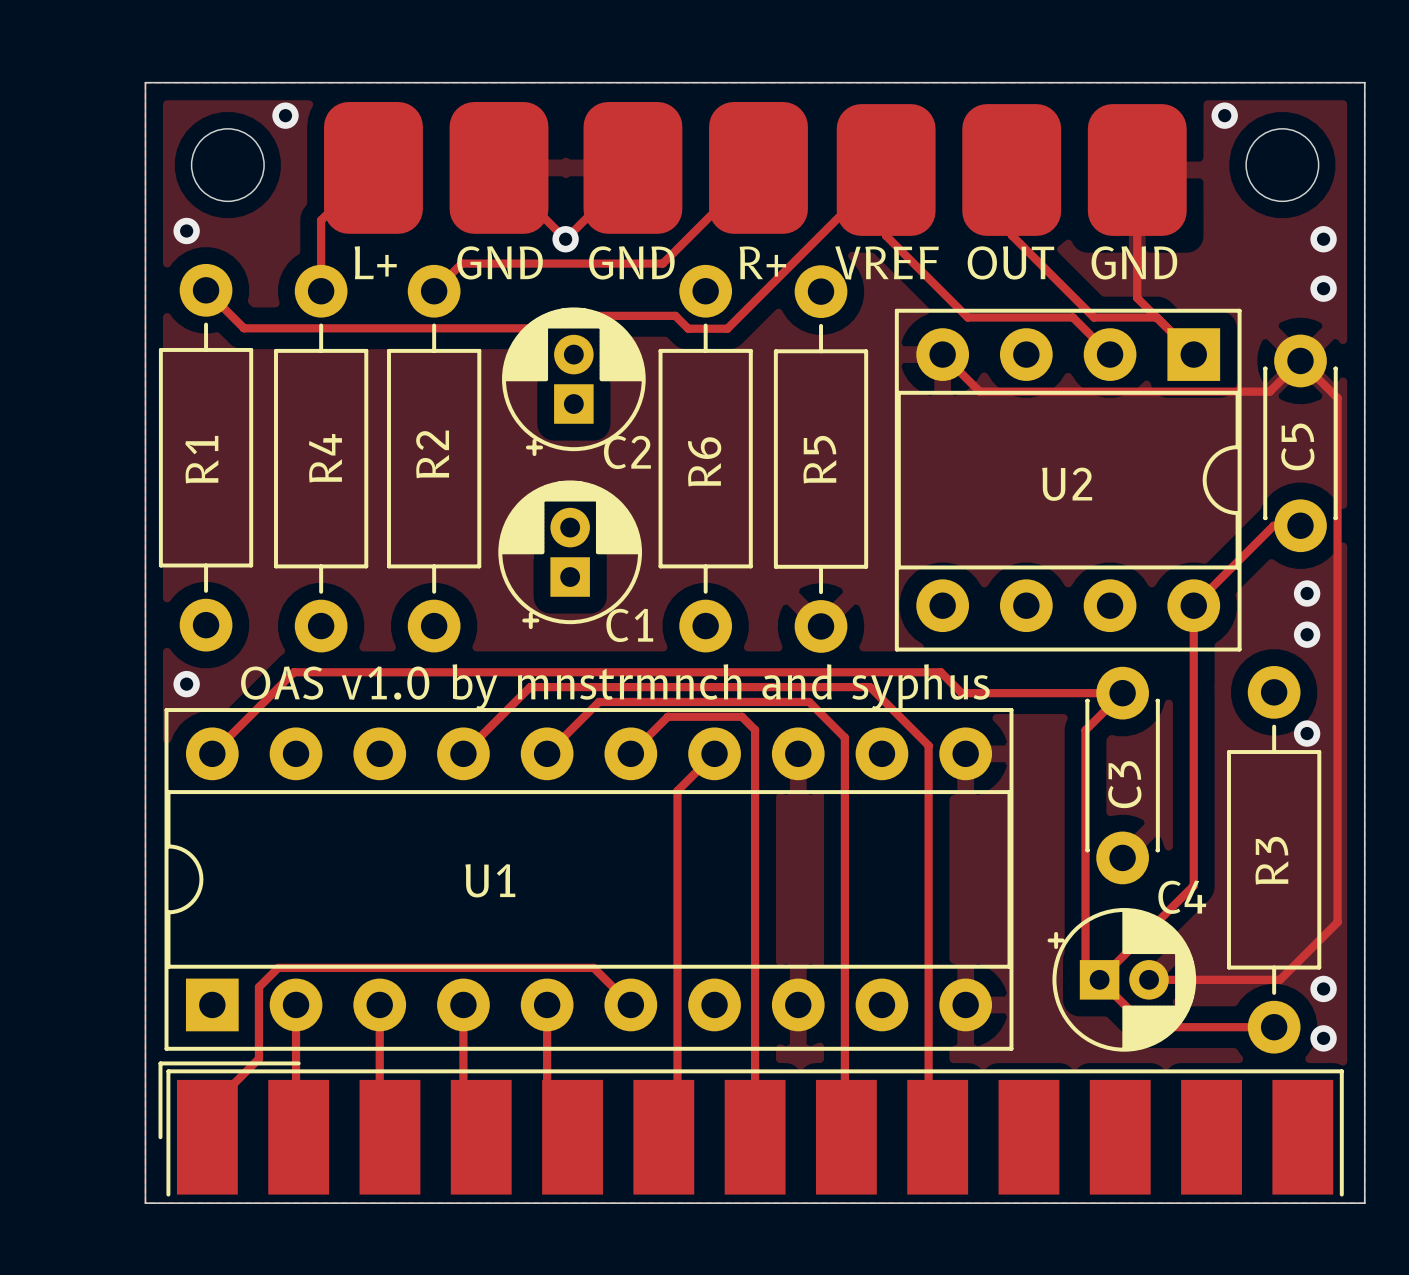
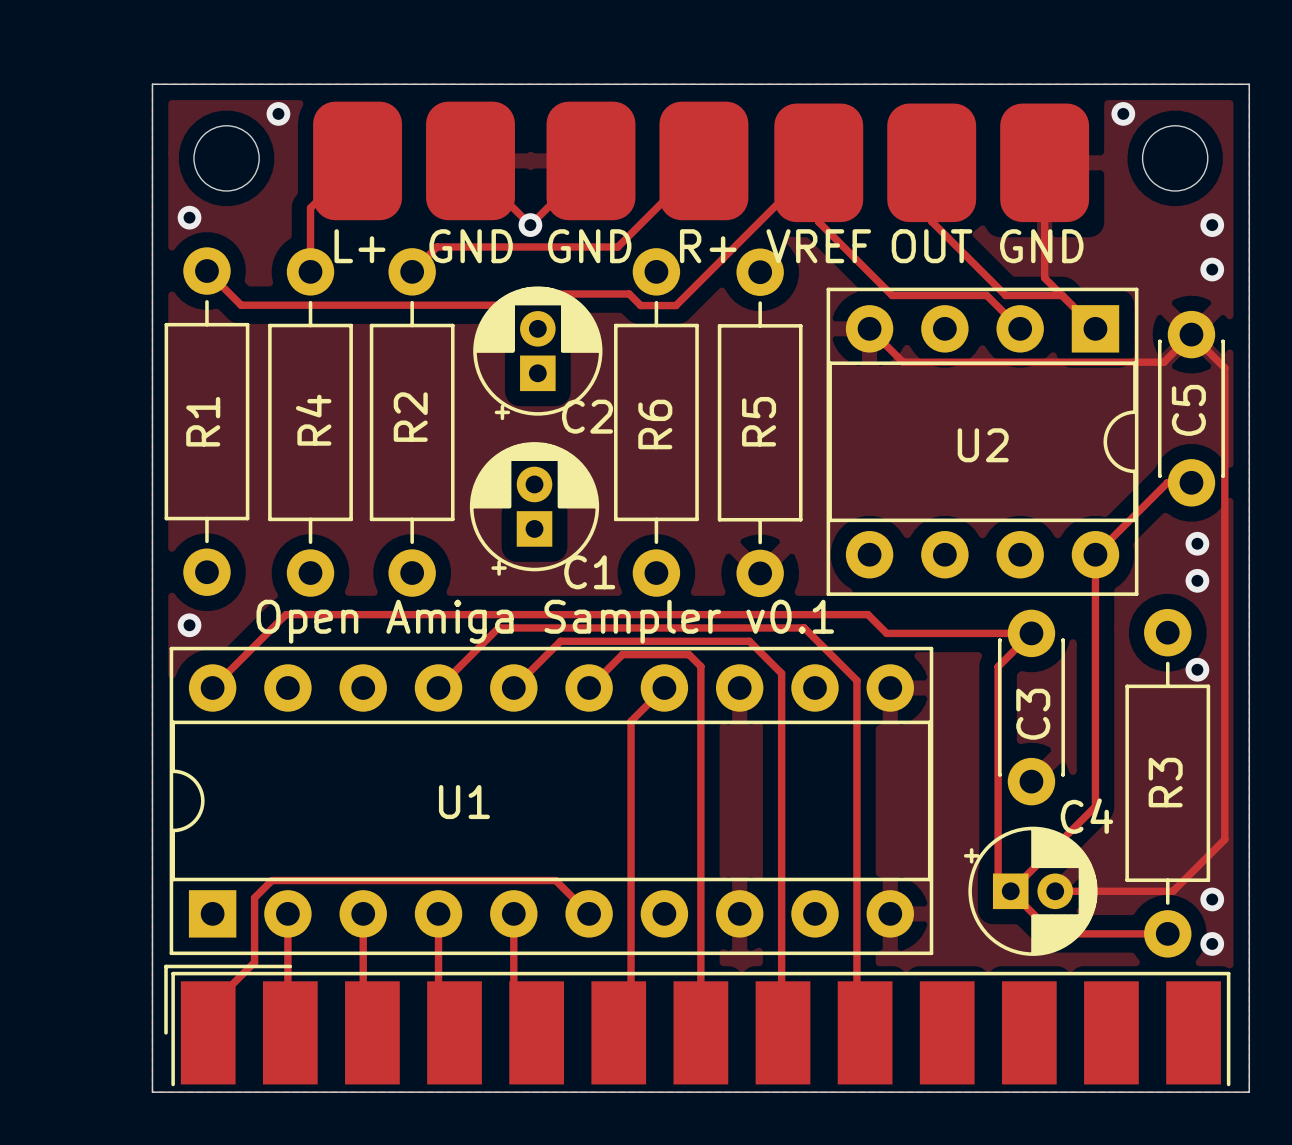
text: none -> Open Amiga Sampler v0.1 (545, 621)
text: OAS v1.0 by mnstrmnch and syphus (615, 687) -> none

